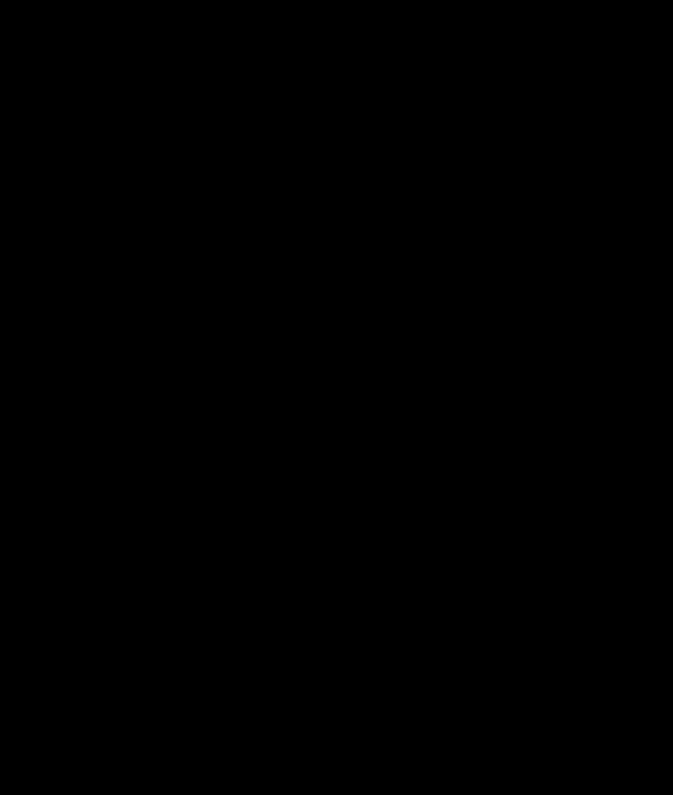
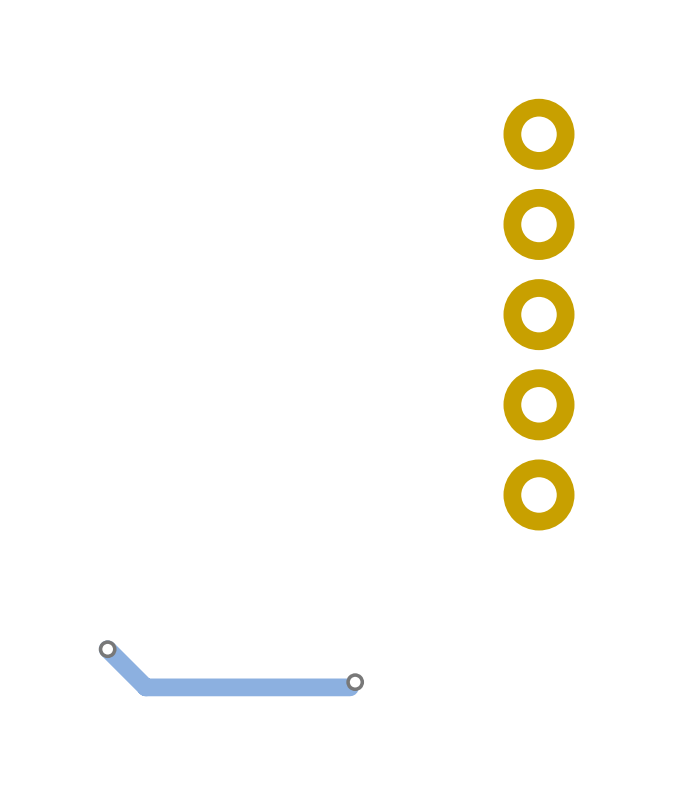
part: none -> (538, 314)
track: none -> (107, 649) (145, 687) (349, 687) (355, 682)
via: none -> (107, 649)
via: none -> (355, 682)

